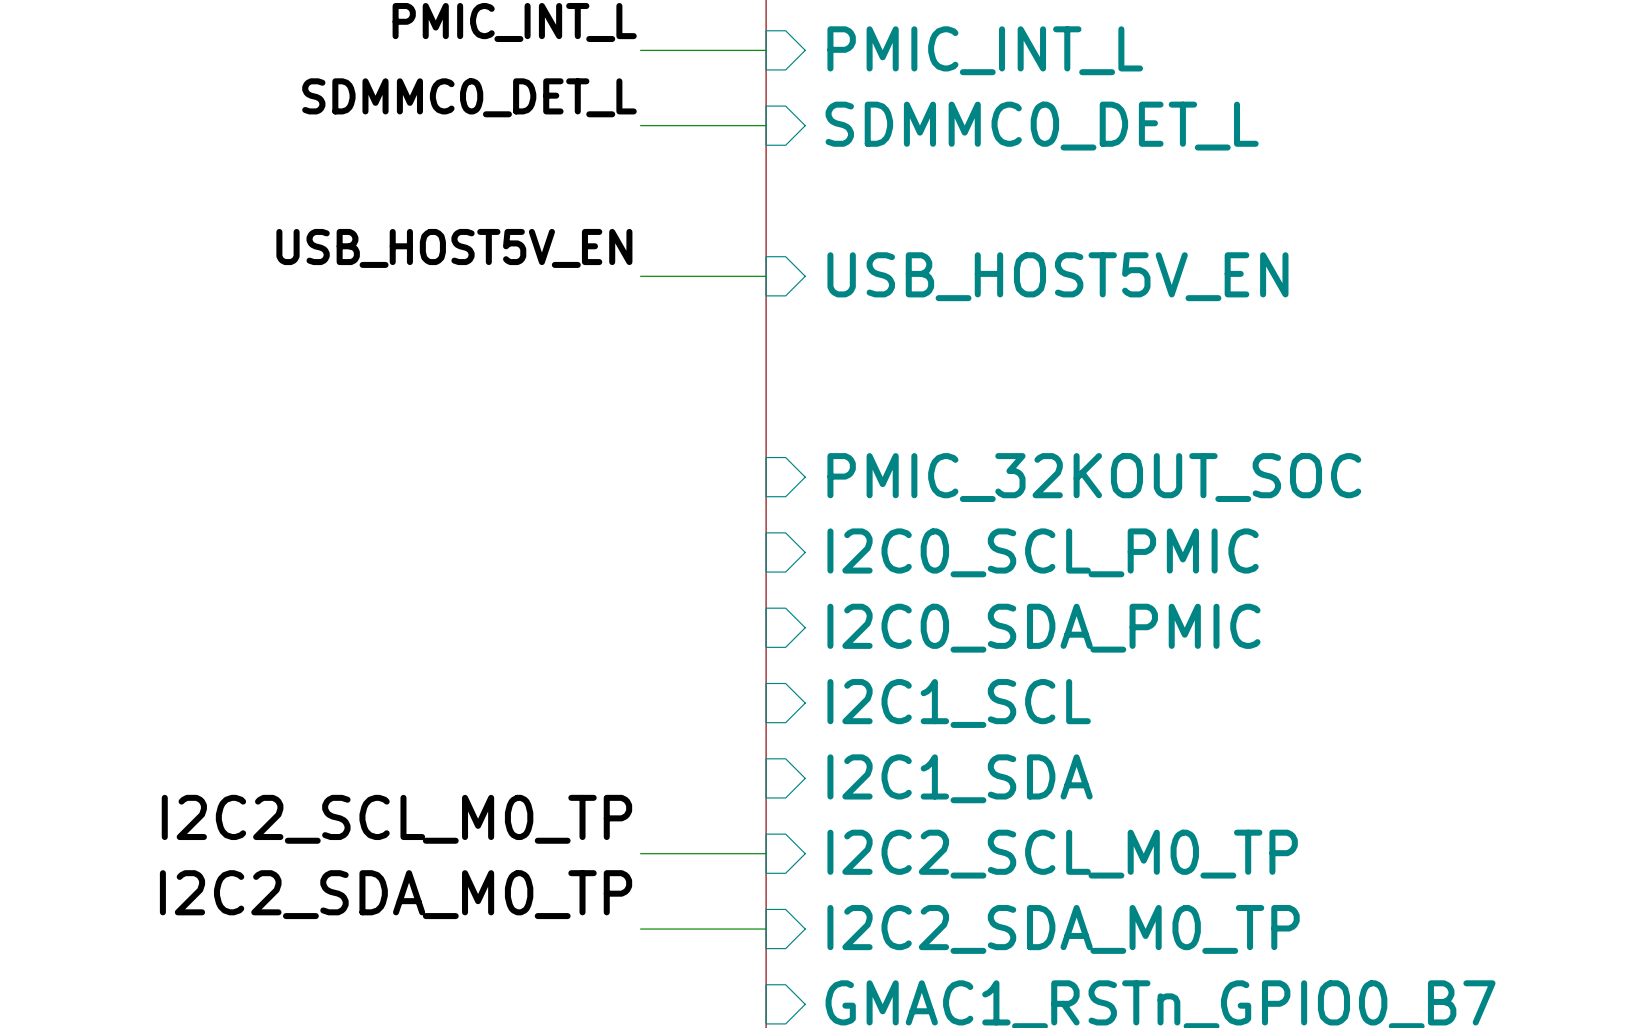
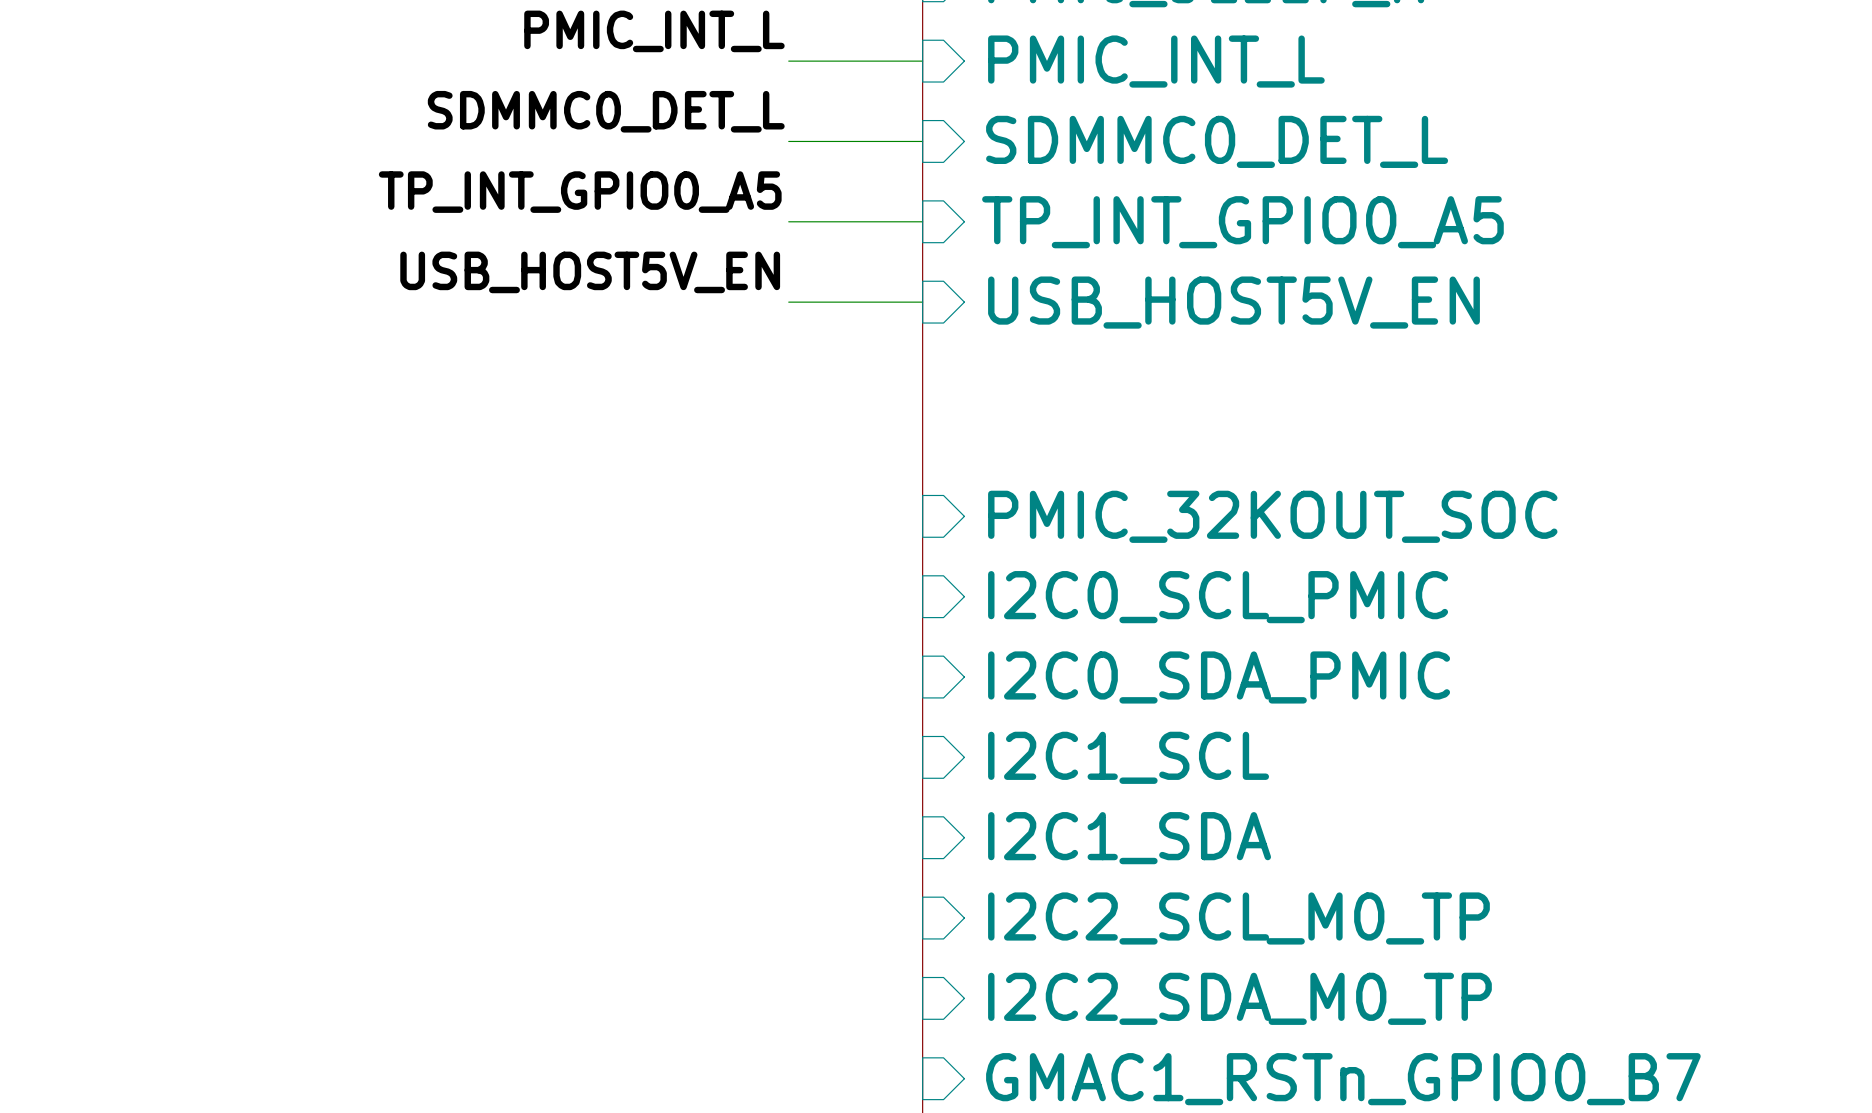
label: none -> TP_INT_GPIO0_A5 (580, 192)
sheet pin: none -> TP_INT_GPIO0_A5 (1242, 222)
label: I2C2_SCL_M0_TP (396, 819) -> none
wire: (640, 853) (766, 853) -> (788, 221) (922, 221)
label: I2C2_SDA_M0_TP (396, 894) -> none
wire: (640, 929) (766, 929) -> none

